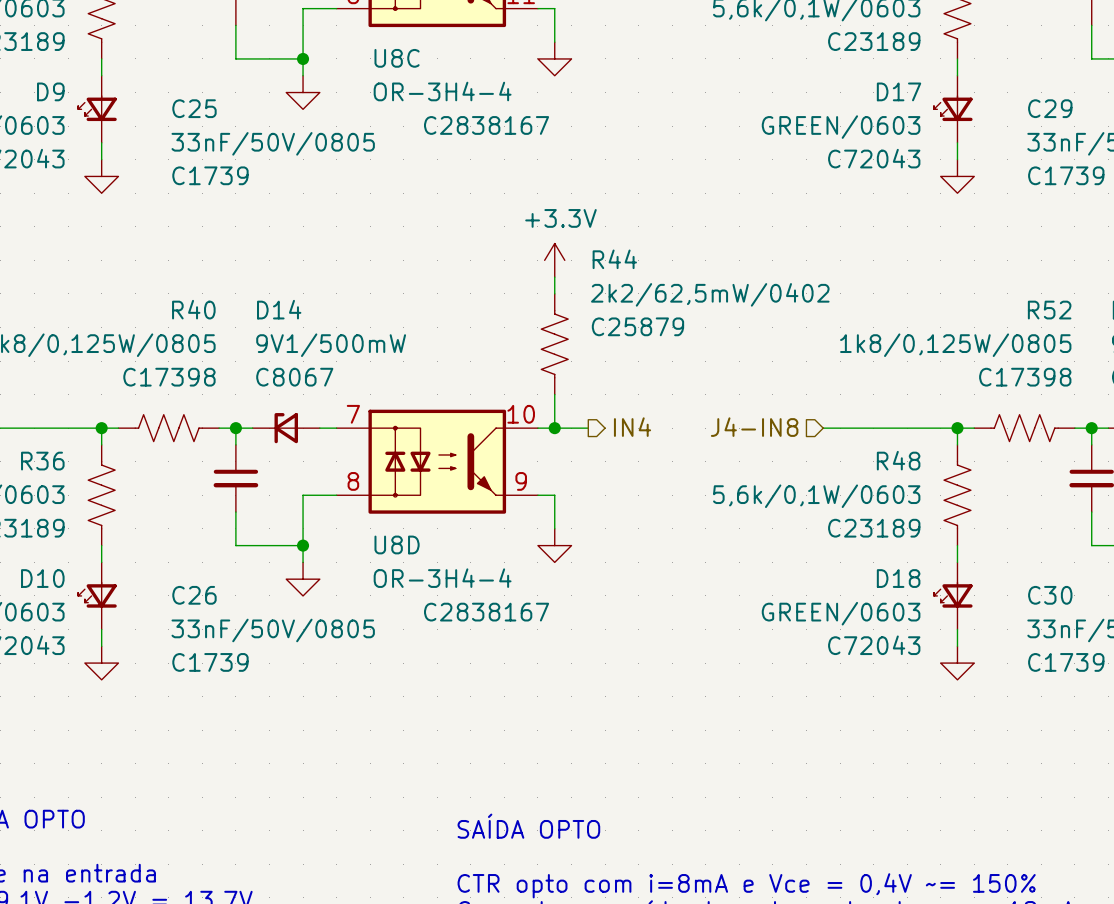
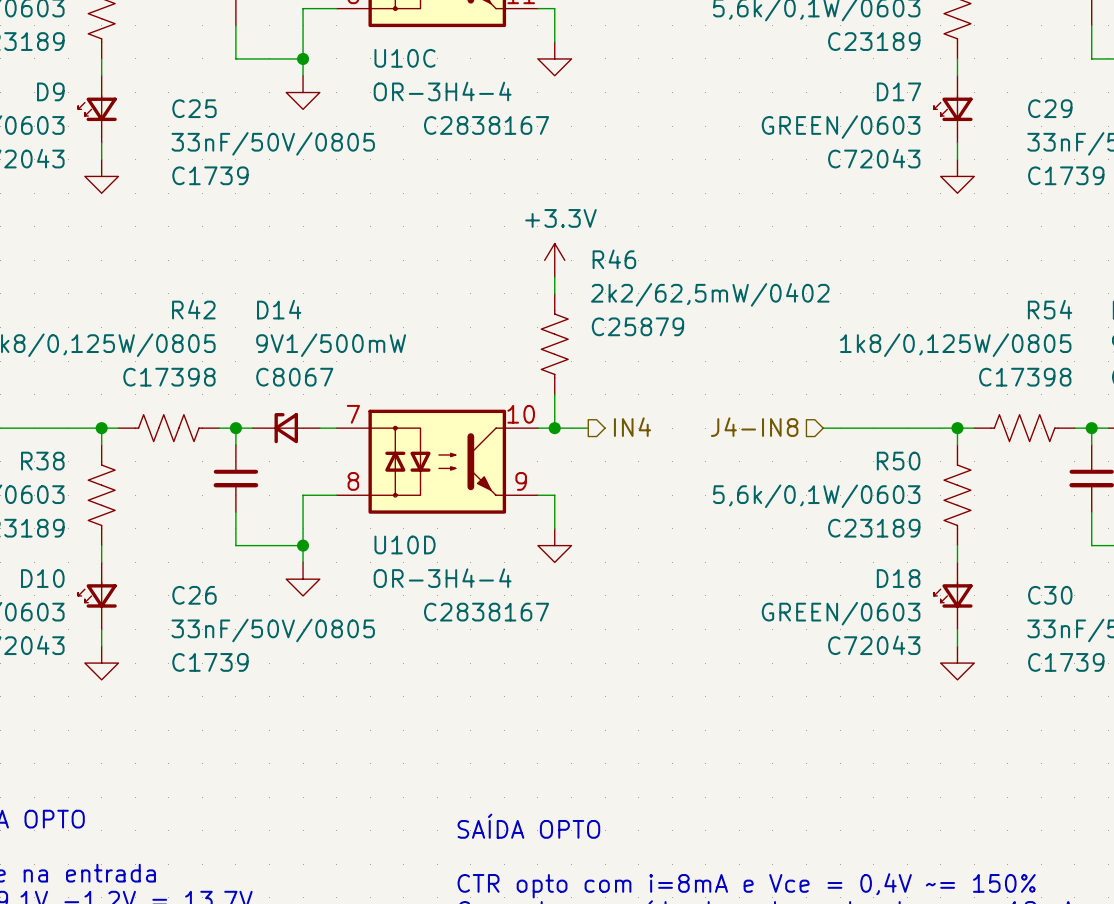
U8C name: U8C (397, 58) -> U10C (405, 58)
R44 name: R44 (614, 259) -> R46 (614, 259)
R40 name: R40 (193, 309) -> R42 (193, 309)
R52 name: R52 (1049, 310) -> R54 (1050, 309)
R48 name: R48 (898, 460) -> R50 (898, 461)
R36 name: R36 (42, 461) -> R38 (42, 461)
U8D name: U8D (397, 544) -> U10D (405, 544)

